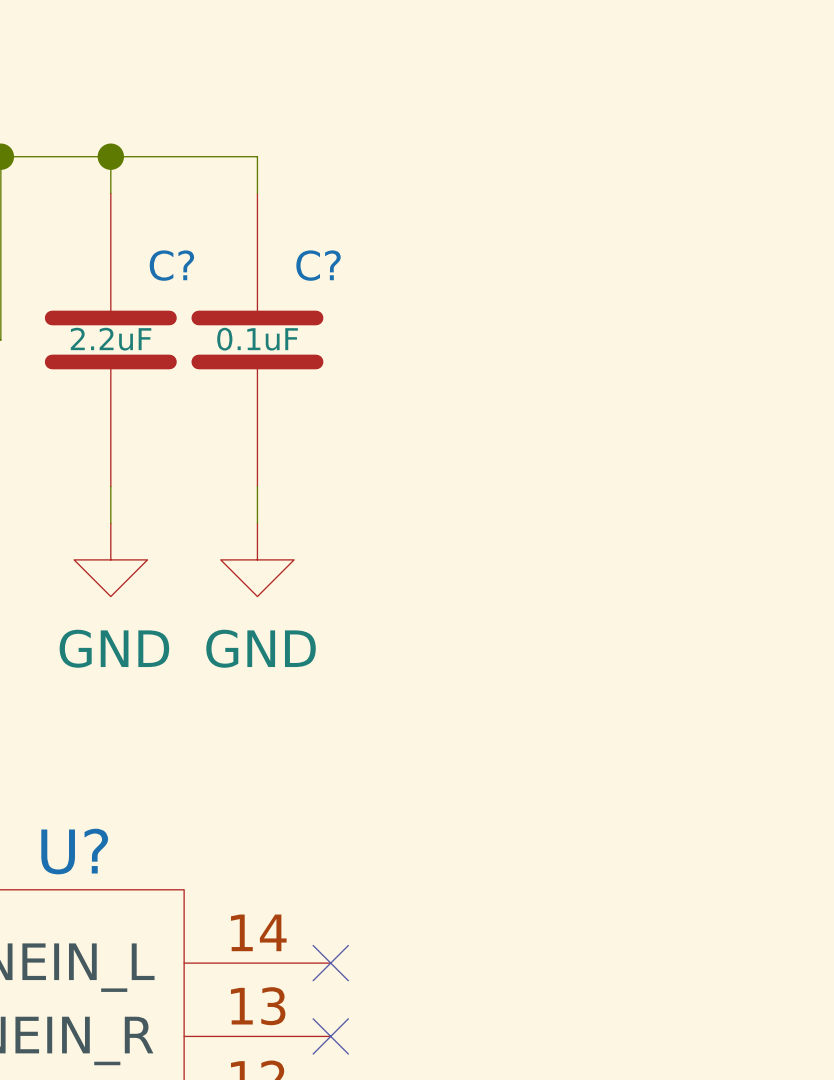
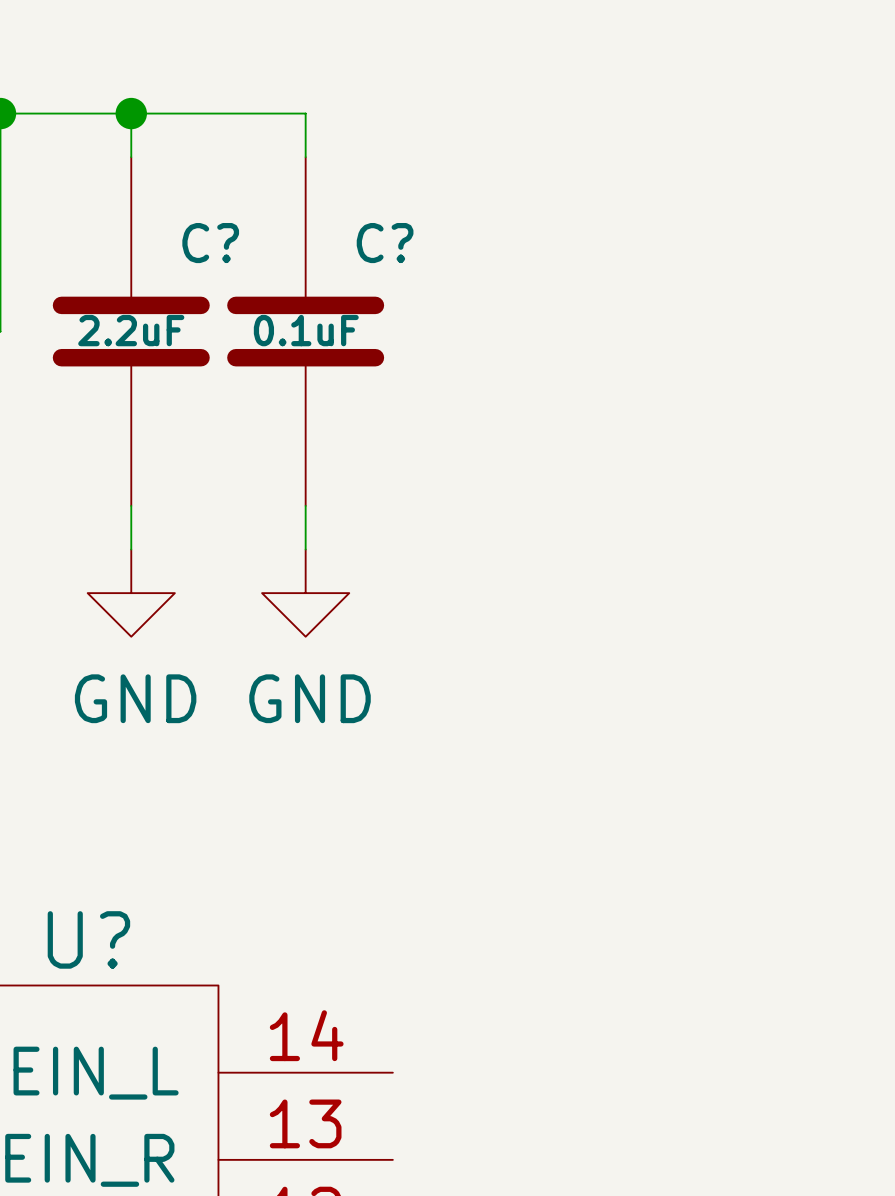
no-connect mark: (330, 963) -> none
no-connect mark: (330, 1036) -> none

